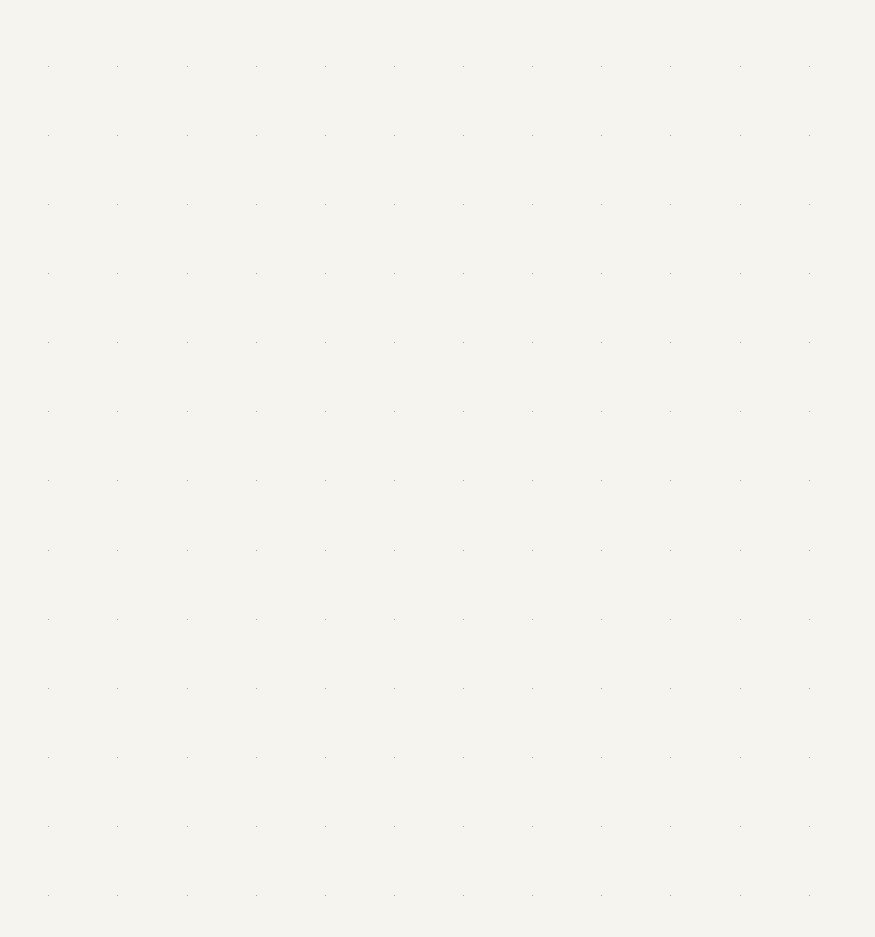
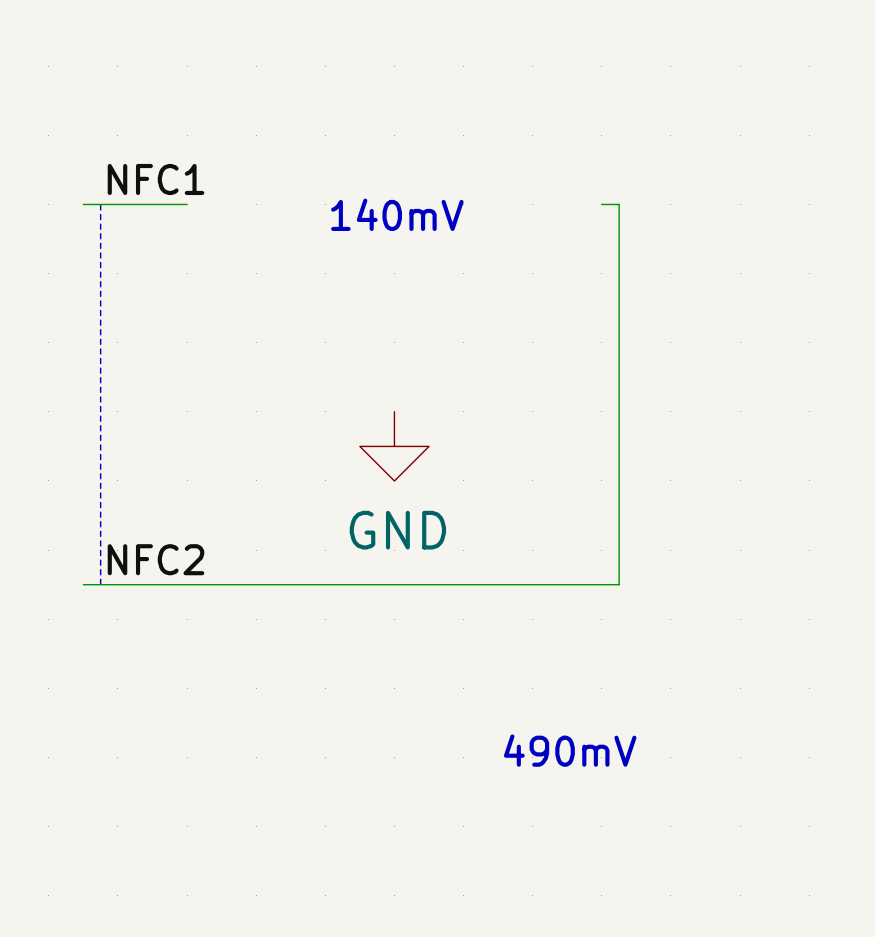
label: none -> NFC1 (156, 179)
wire: none -> (83, 204) (187, 204)
line: none -> (100, 204) (100, 584)
wire: none -> (601, 204) (619, 204) (619, 584) (83, 584)
text: none -> 140mV (397, 214)
power symbol: none -> GND (394, 446)
label: none -> NFC2 (156, 559)
text: none -> 490mV (570, 750)

